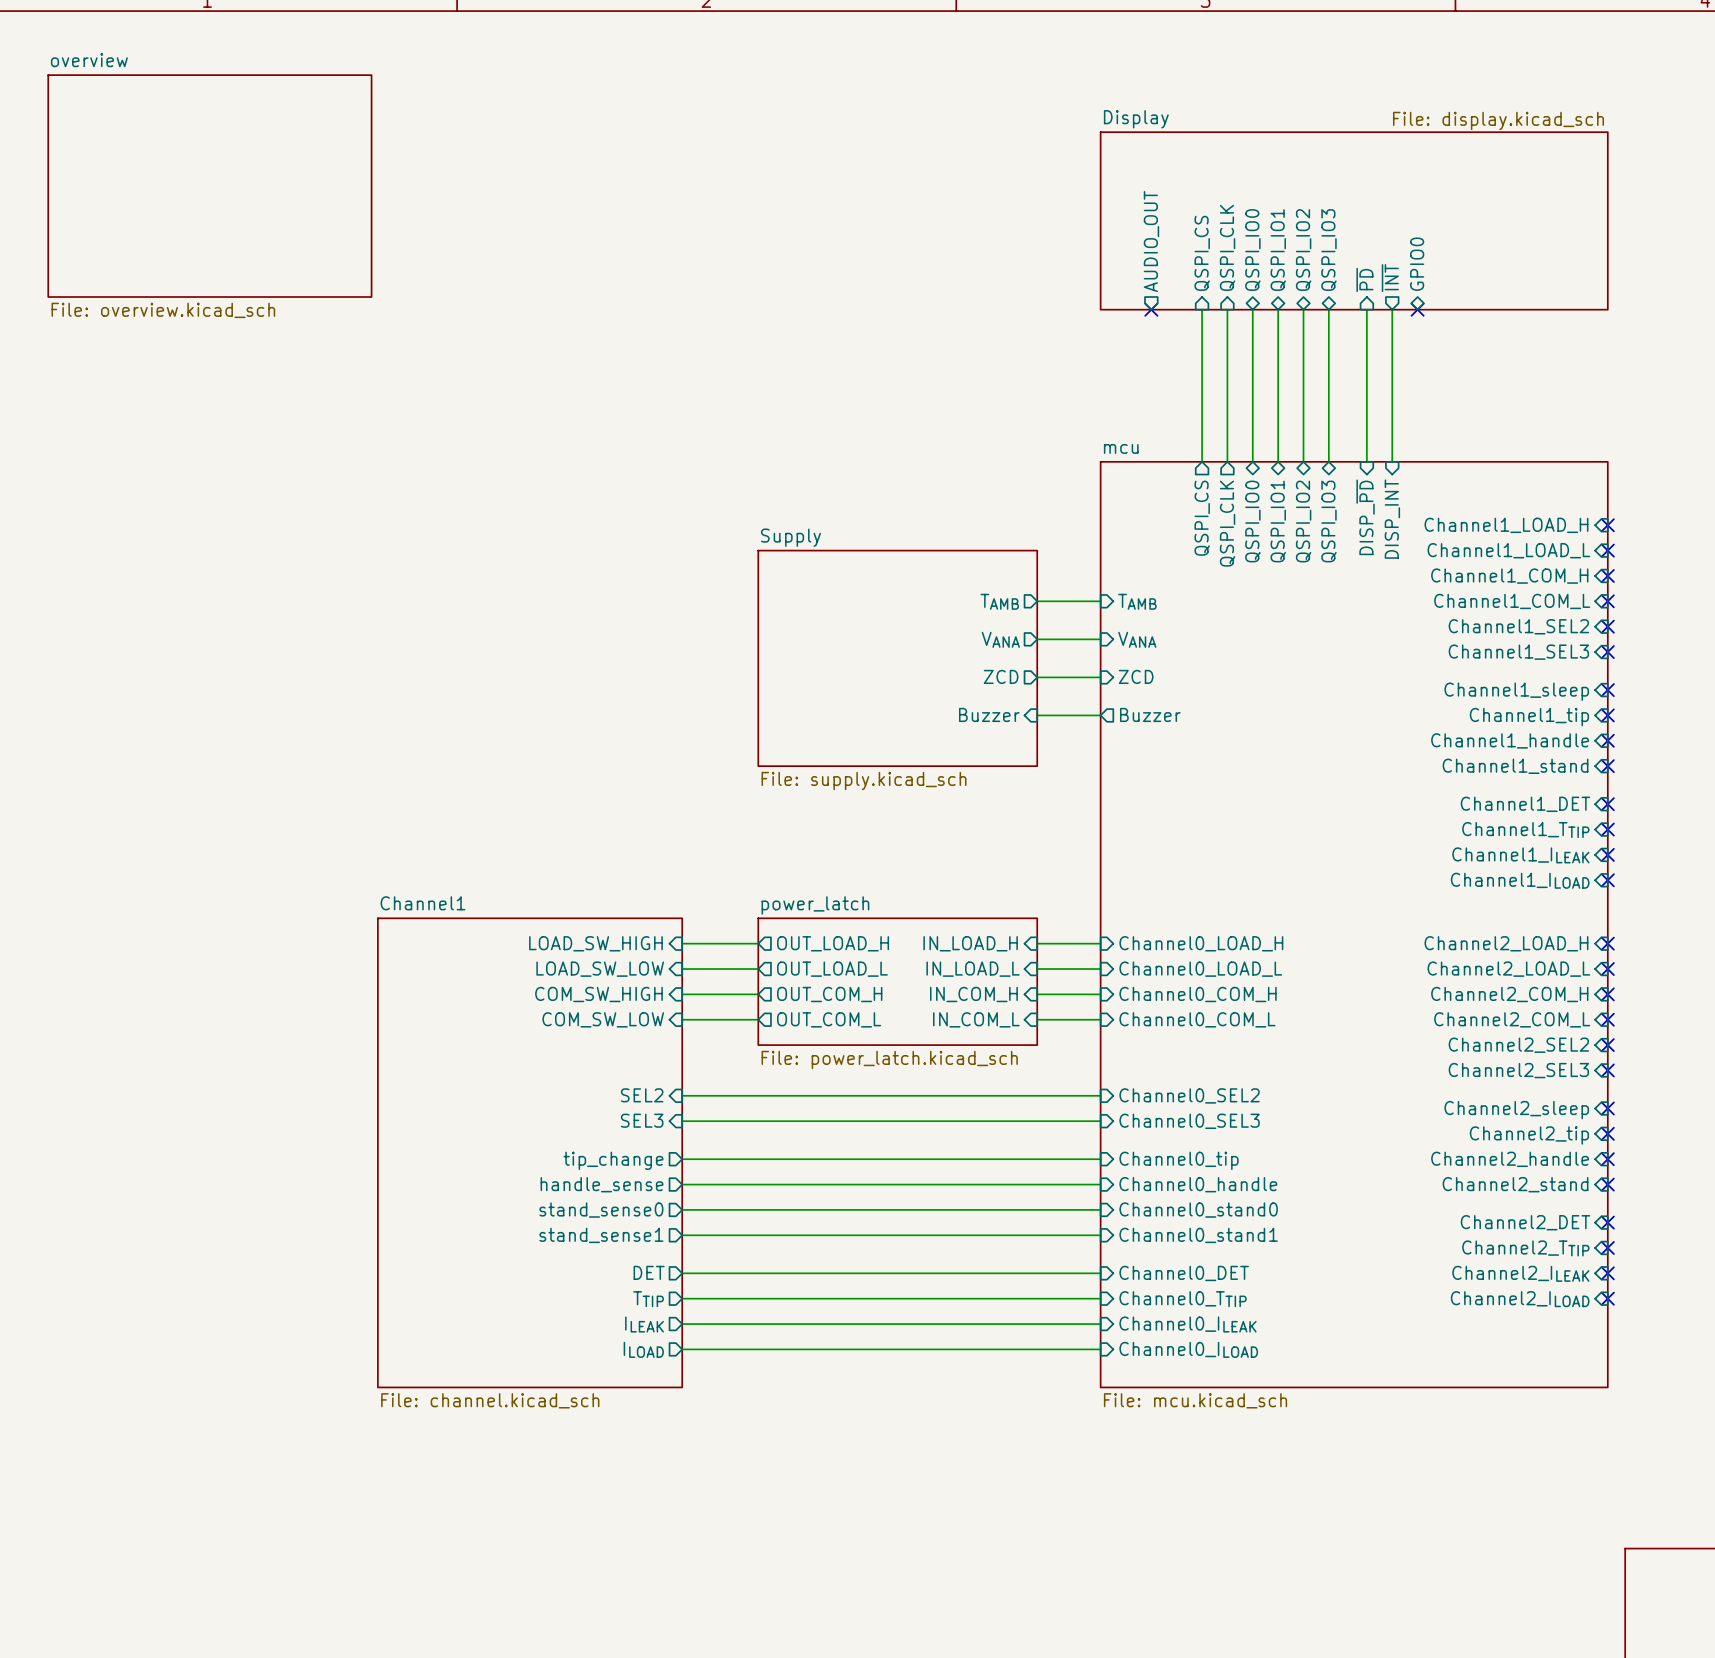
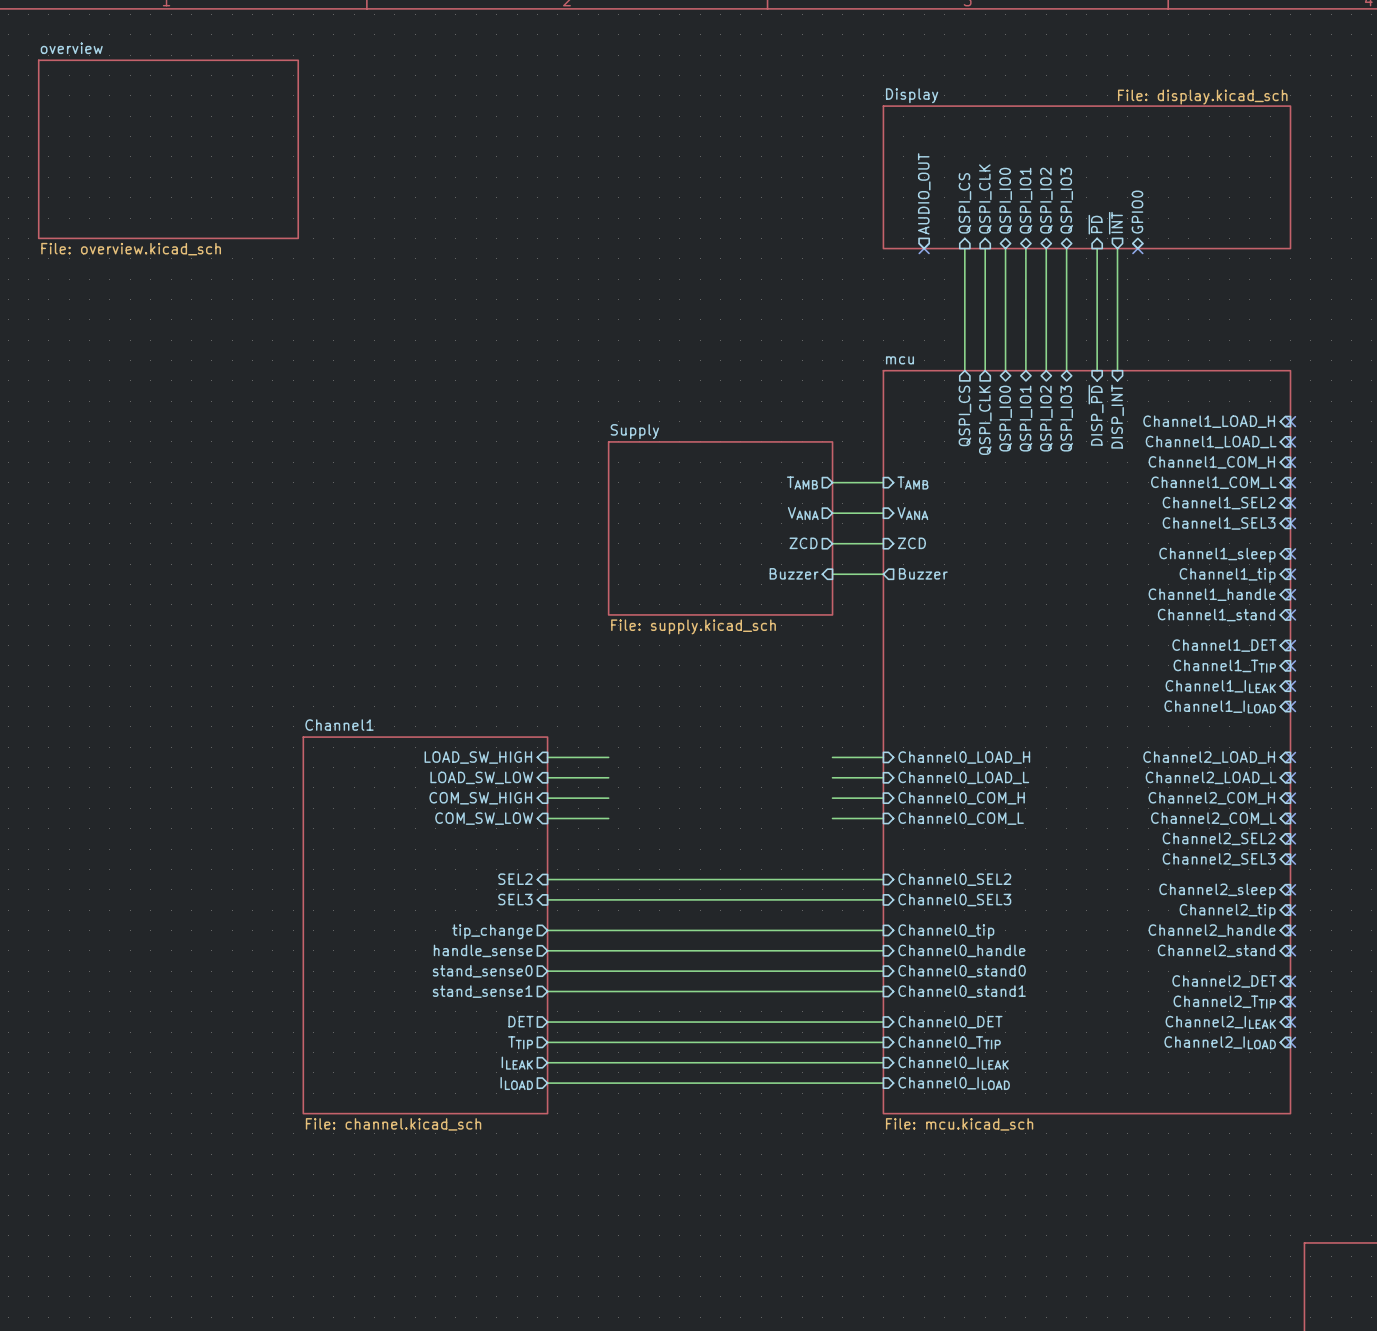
sheet pin: OUT_LOAD_H (833, 943) -> none
sheet pin: IN_LOAD_H (970, 943) -> none
sheet pin: OUT_LOAD_L (832, 969) -> none
sheet pin: IN_LOAD_L (973, 969) -> none
sheet power_latch: File: power_latch.kicad_sch (897, 981) -> none
sheet pin: OUT_COM_H (829, 994) -> none
sheet pin: IN_COM_H (973, 994) -> none
sheet pin: OUT_COM_L (829, 1019) -> none
sheet pin: IN_COM_L (976, 1019) -> none

